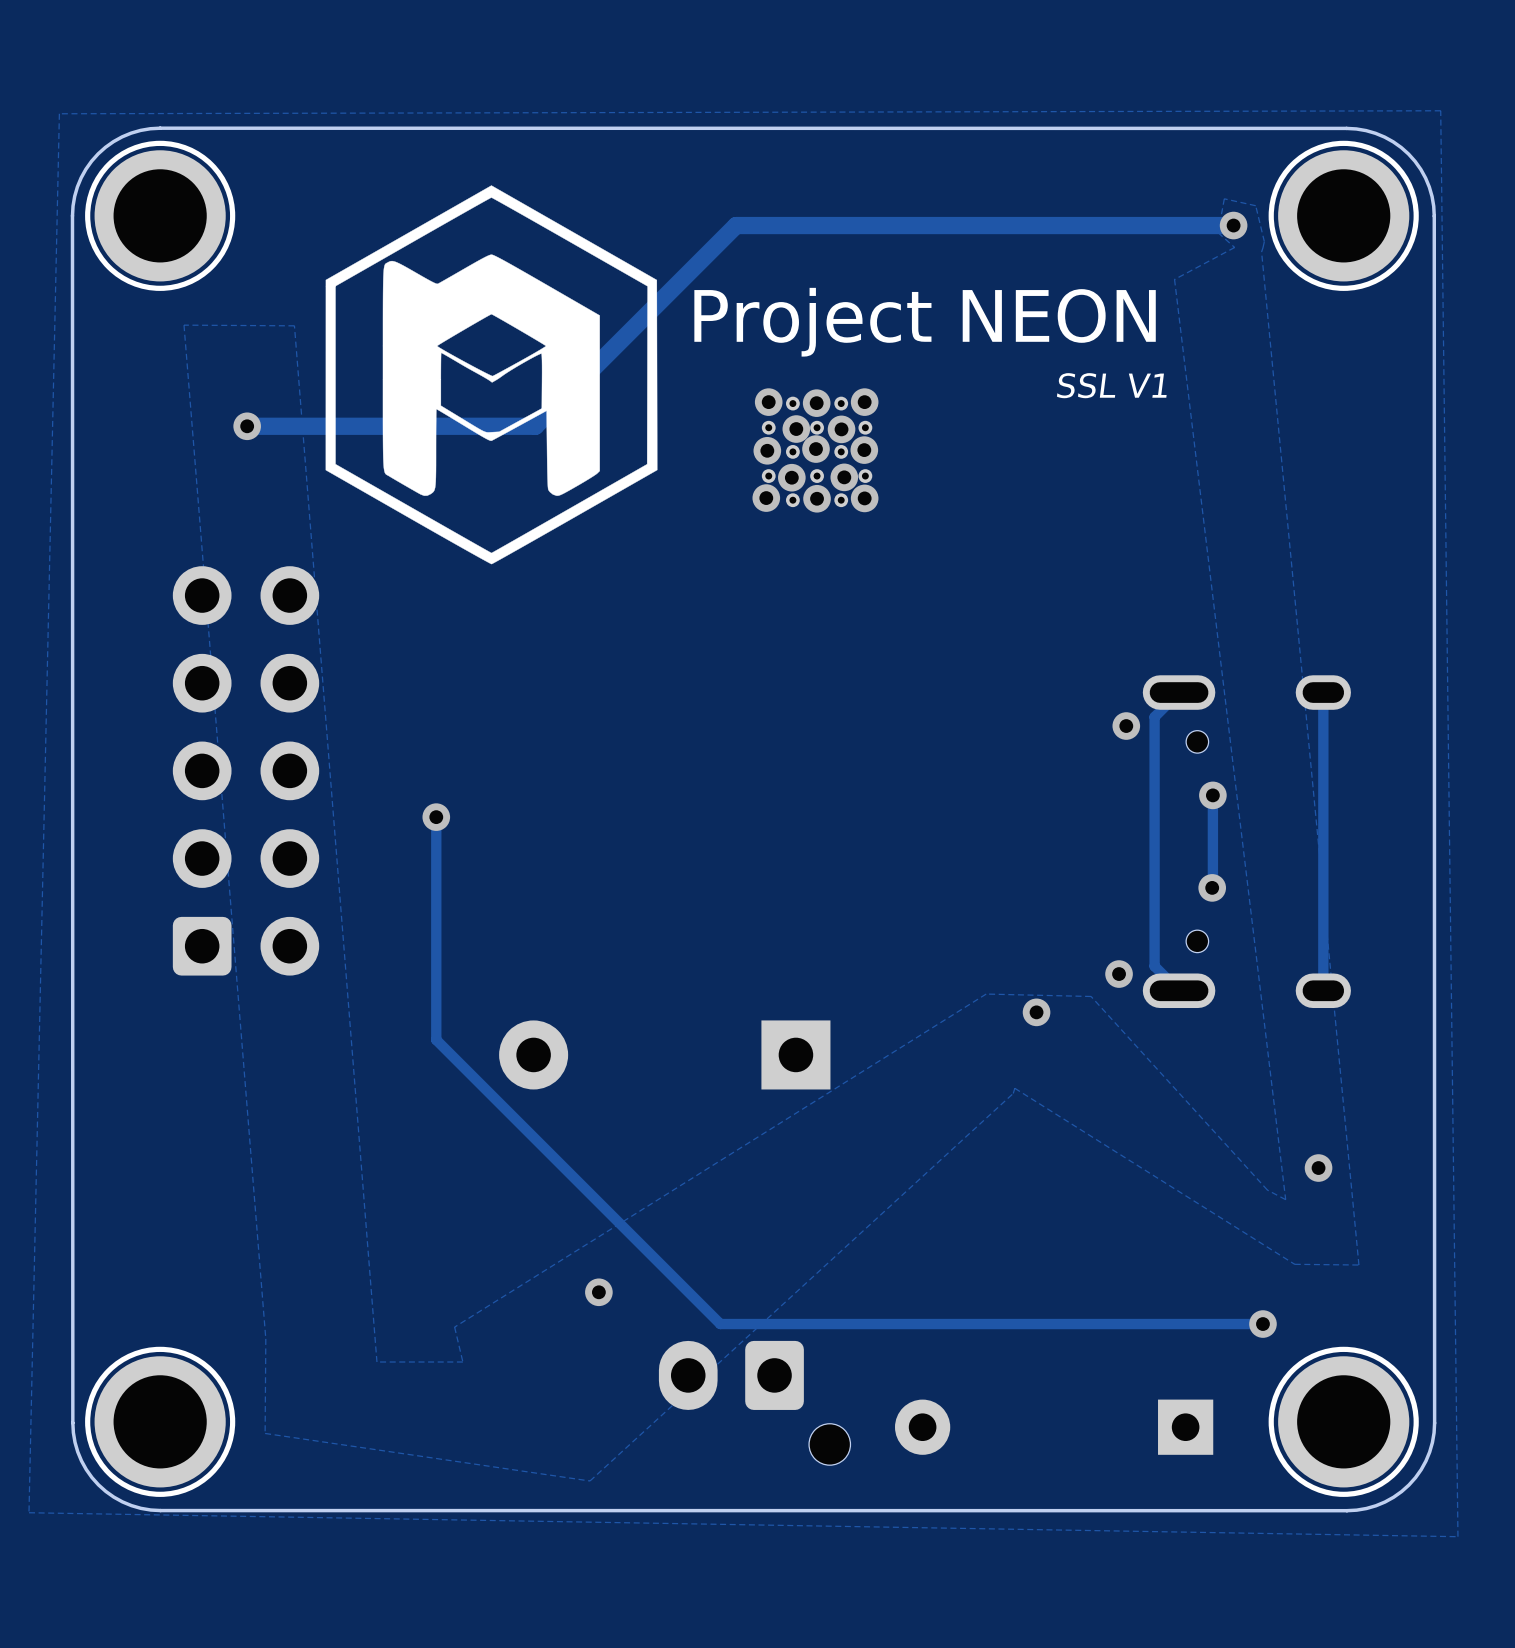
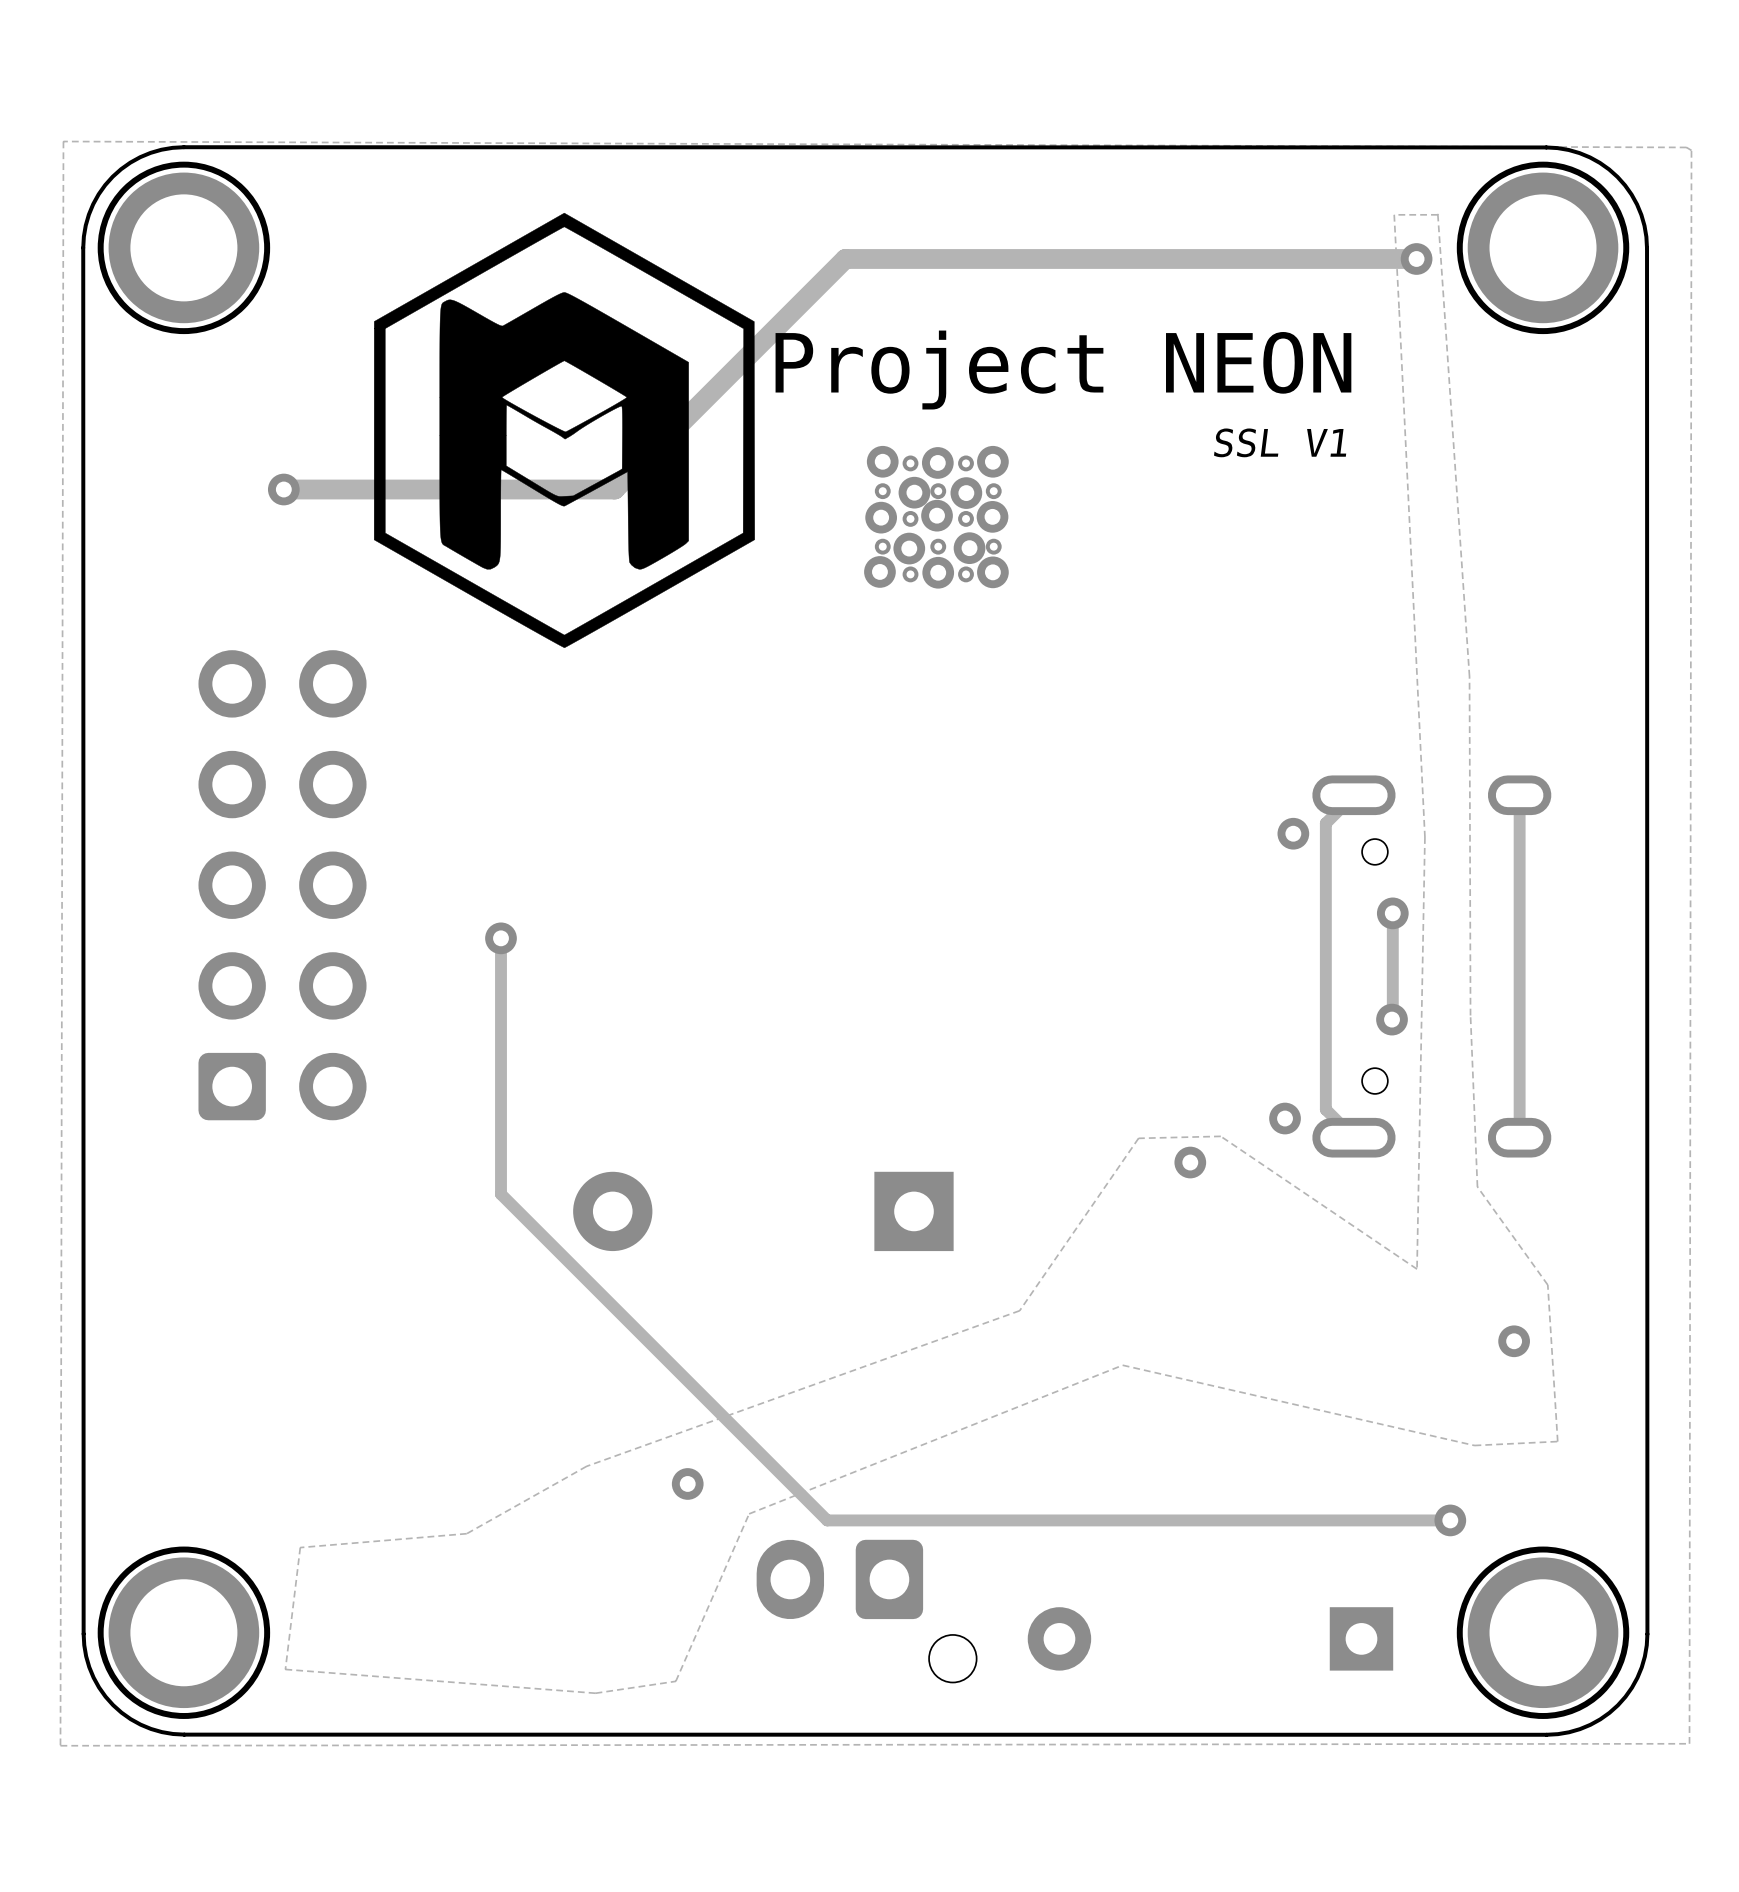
zone outline: (1440, 110) (1457, 1536) (28, 1512) (59, 113) (1440, 110) -> (63, 141) (1686, 147) (1691, 150) (1689, 1743) (60, 1745) (63, 141)
zone outline: (1224, 198) (1218, 232) (1234, 247) (1174, 279) (1285, 1199) (1267, 1190) (1091, 996) (986, 994) (454, 1327) (462, 1362) (376, 1362) (294, 325) (184, 325) (265, 1338) (265, 1433) (590, 1480) (1013, 1093) (1014, 1088) (1294, 1264) (1358, 1265) (1261, 251) (1264, 241) (1255, 205) (1224, 198) -> (1437, 213) (1469, 676) (1470, 1015) (1477, 1186) (1547, 1284) (1557, 1441) (1474, 1445) (1122, 1365) (749, 1513) (675, 1681) (595, 1693) (285, 1669) (300, 1547) (466, 1533) (586, 1466) (1019, 1310) (1138, 1138) (1220, 1136) (1417, 1269) (1424, 837) (1394, 214) (1437, 213)

